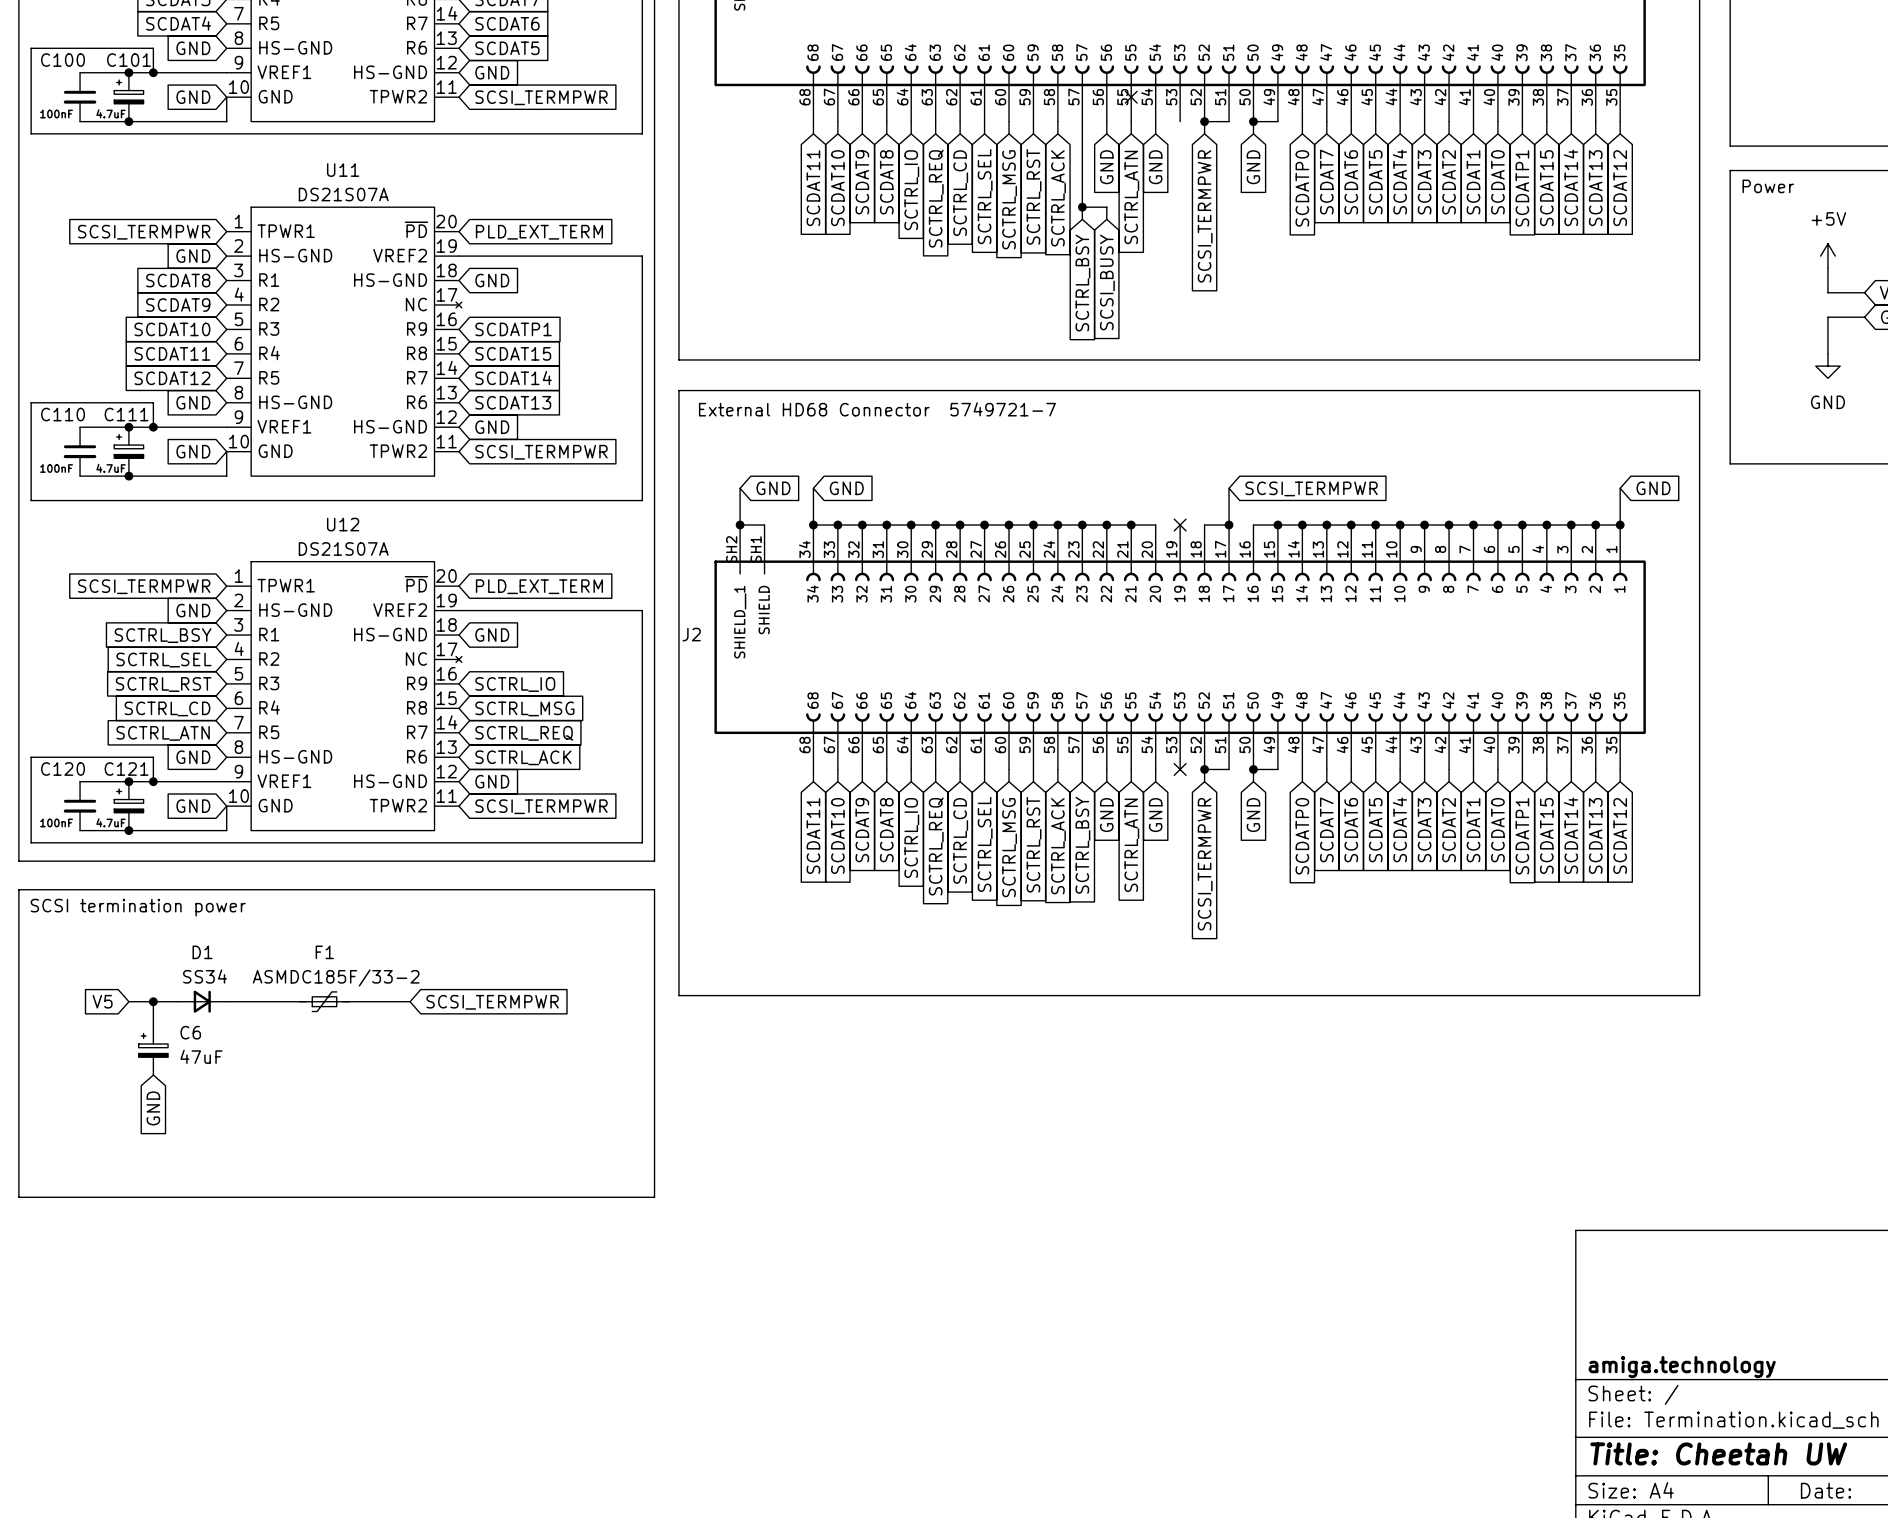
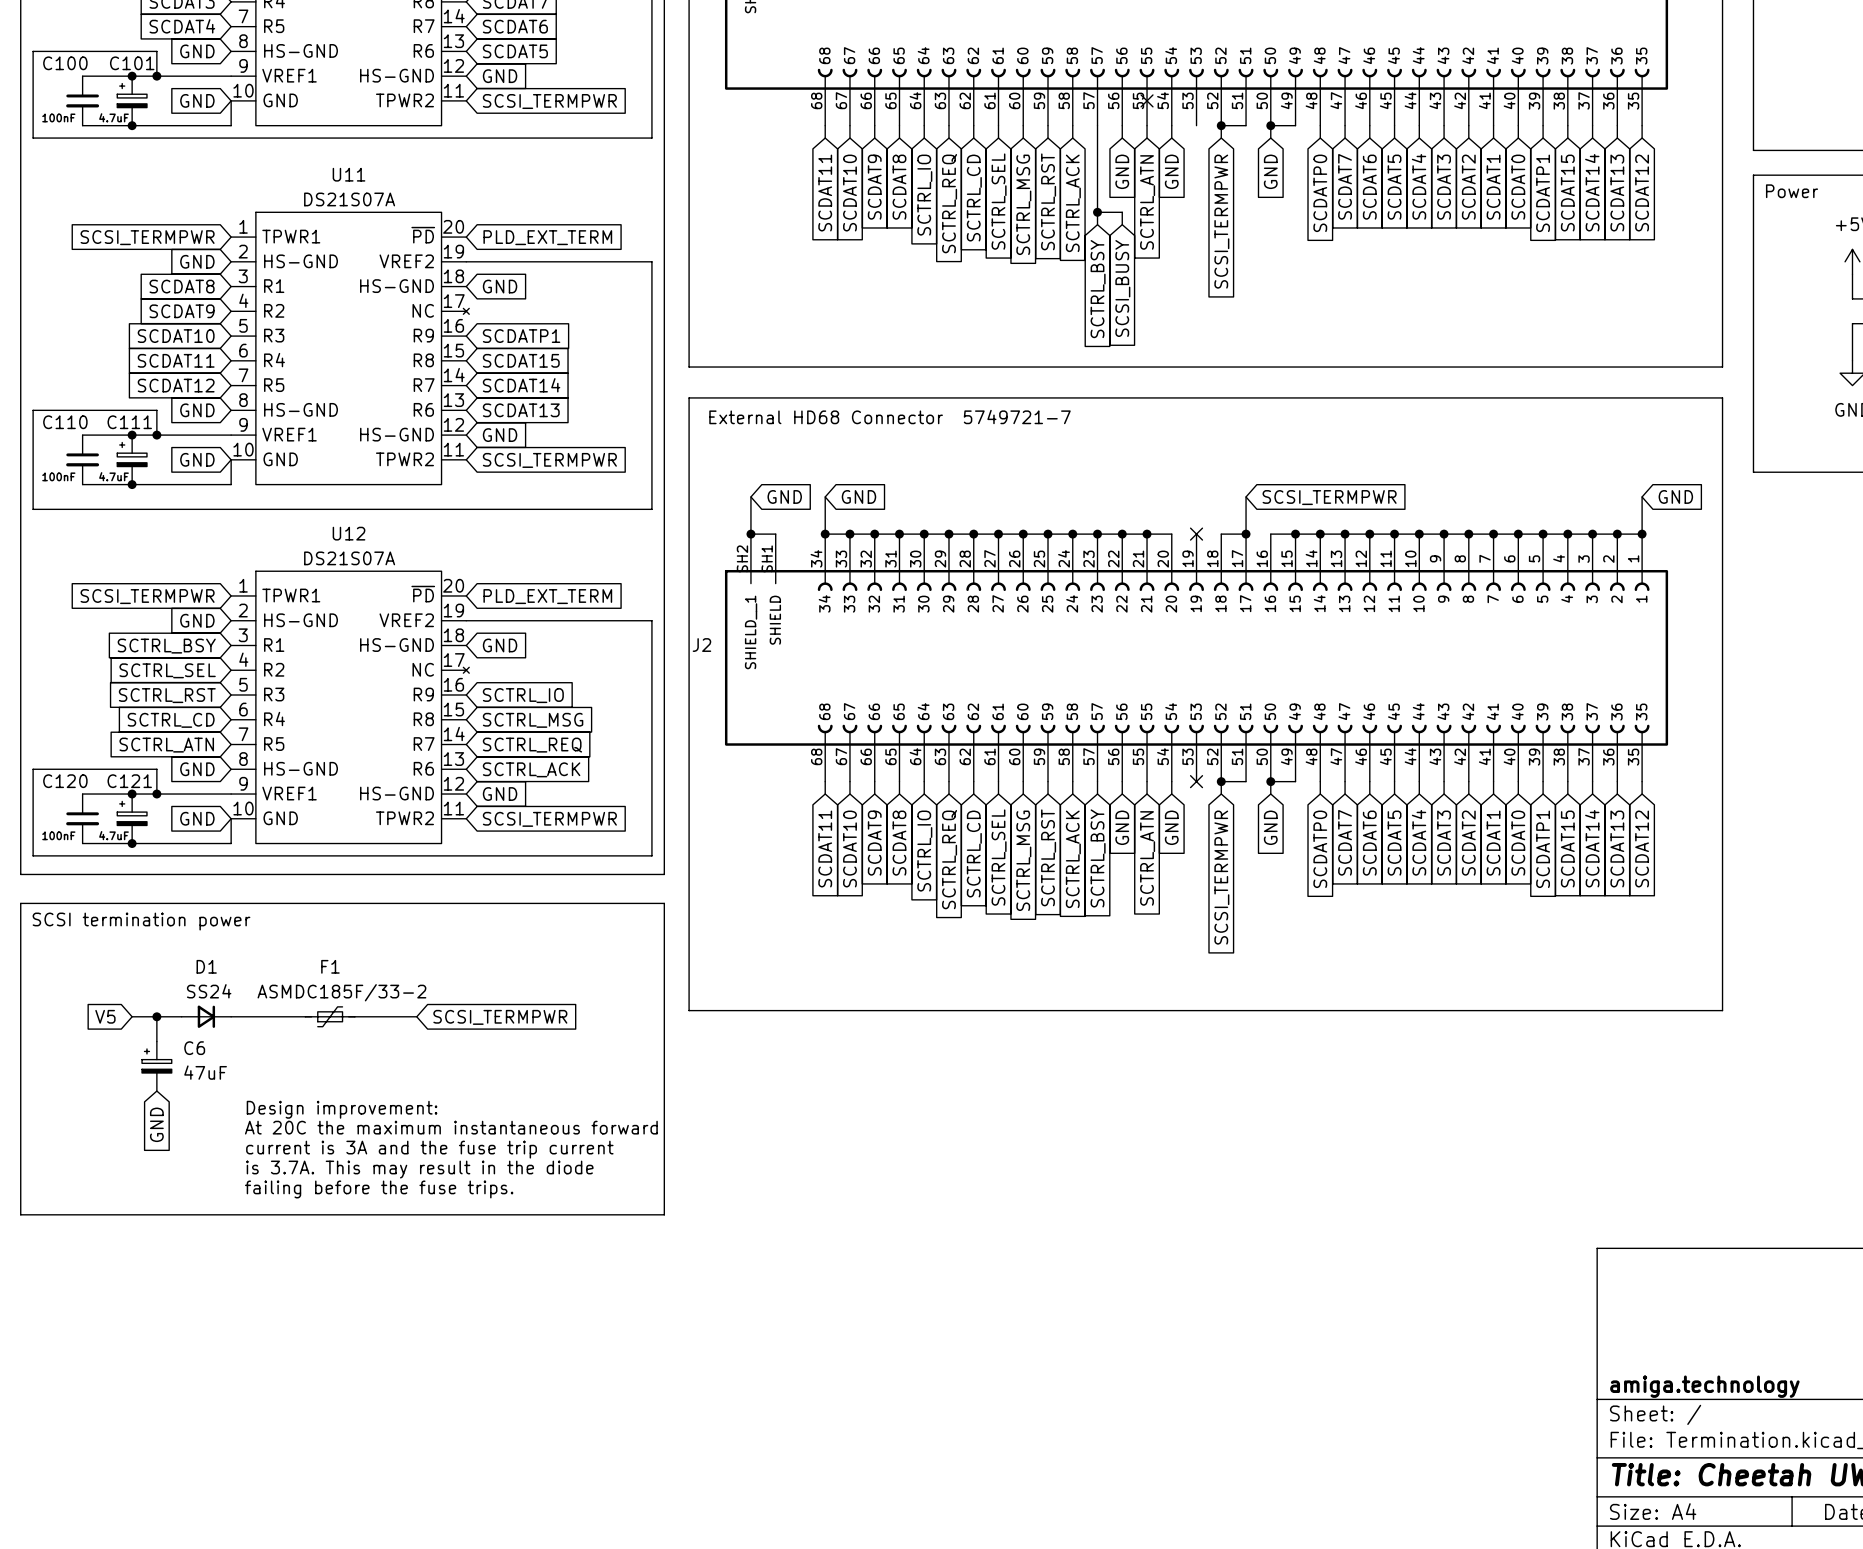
D1 value: SS34 (205, 976) -> SS24 (209, 991)
text: none -> Design improvement: (342, 1109)
text: none -> At 20C the maximum instantaneous forward (451, 1127)
text: none -> current is 3A and the fuse trip current (429, 1149)
text: none -> is 3.7A. This may result in the diode (419, 1169)
text: none -> failing before the fuse trips. (379, 1189)

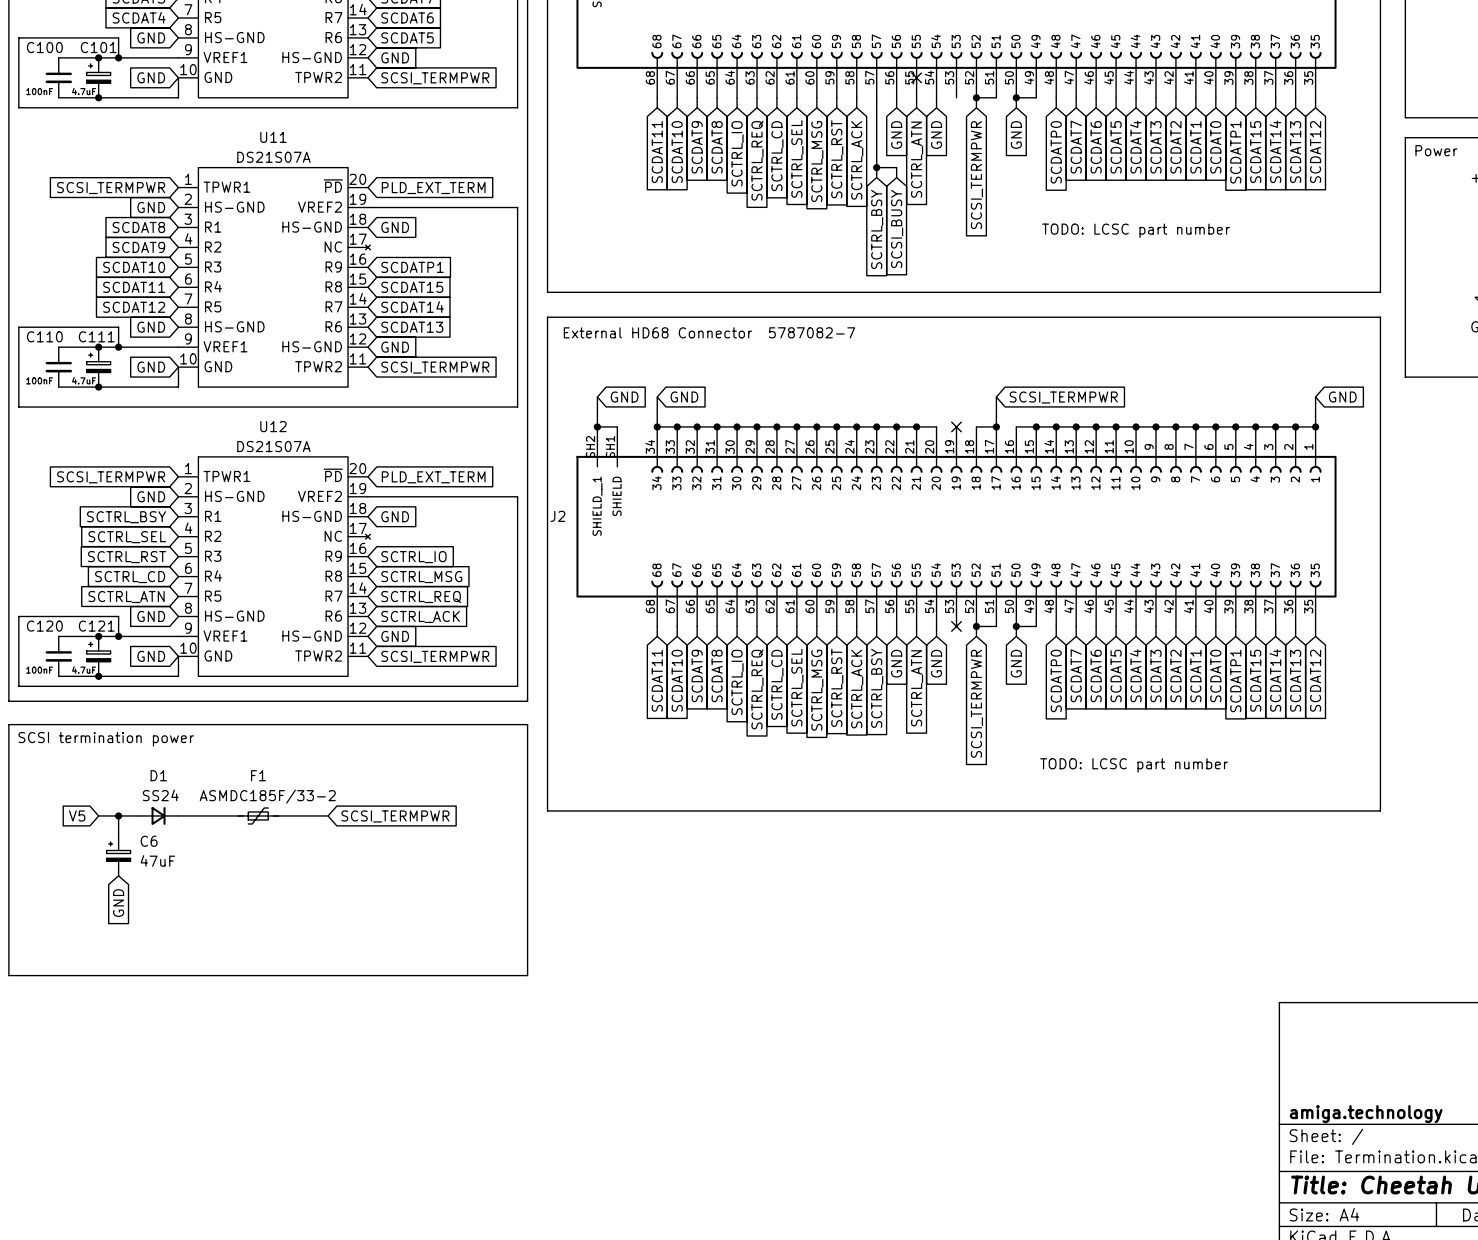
text: none -> TODO: LCSC part number (1136, 230)
J2 value: 5749721-7 (1017, 417) -> 5787082-7 (812, 332)
text: none -> TODO: LCSC part number (1134, 765)
text: Design improvement: (342, 1109) -> none
text: At 20C the maximum instantaneous forward (451, 1127) -> none
text: current is 3A and the fuse trip current (429, 1149) -> none
text: is 3.7A. This may result in the diode (419, 1169) -> none
text: failing before the fuse trips. (379, 1189) -> none

